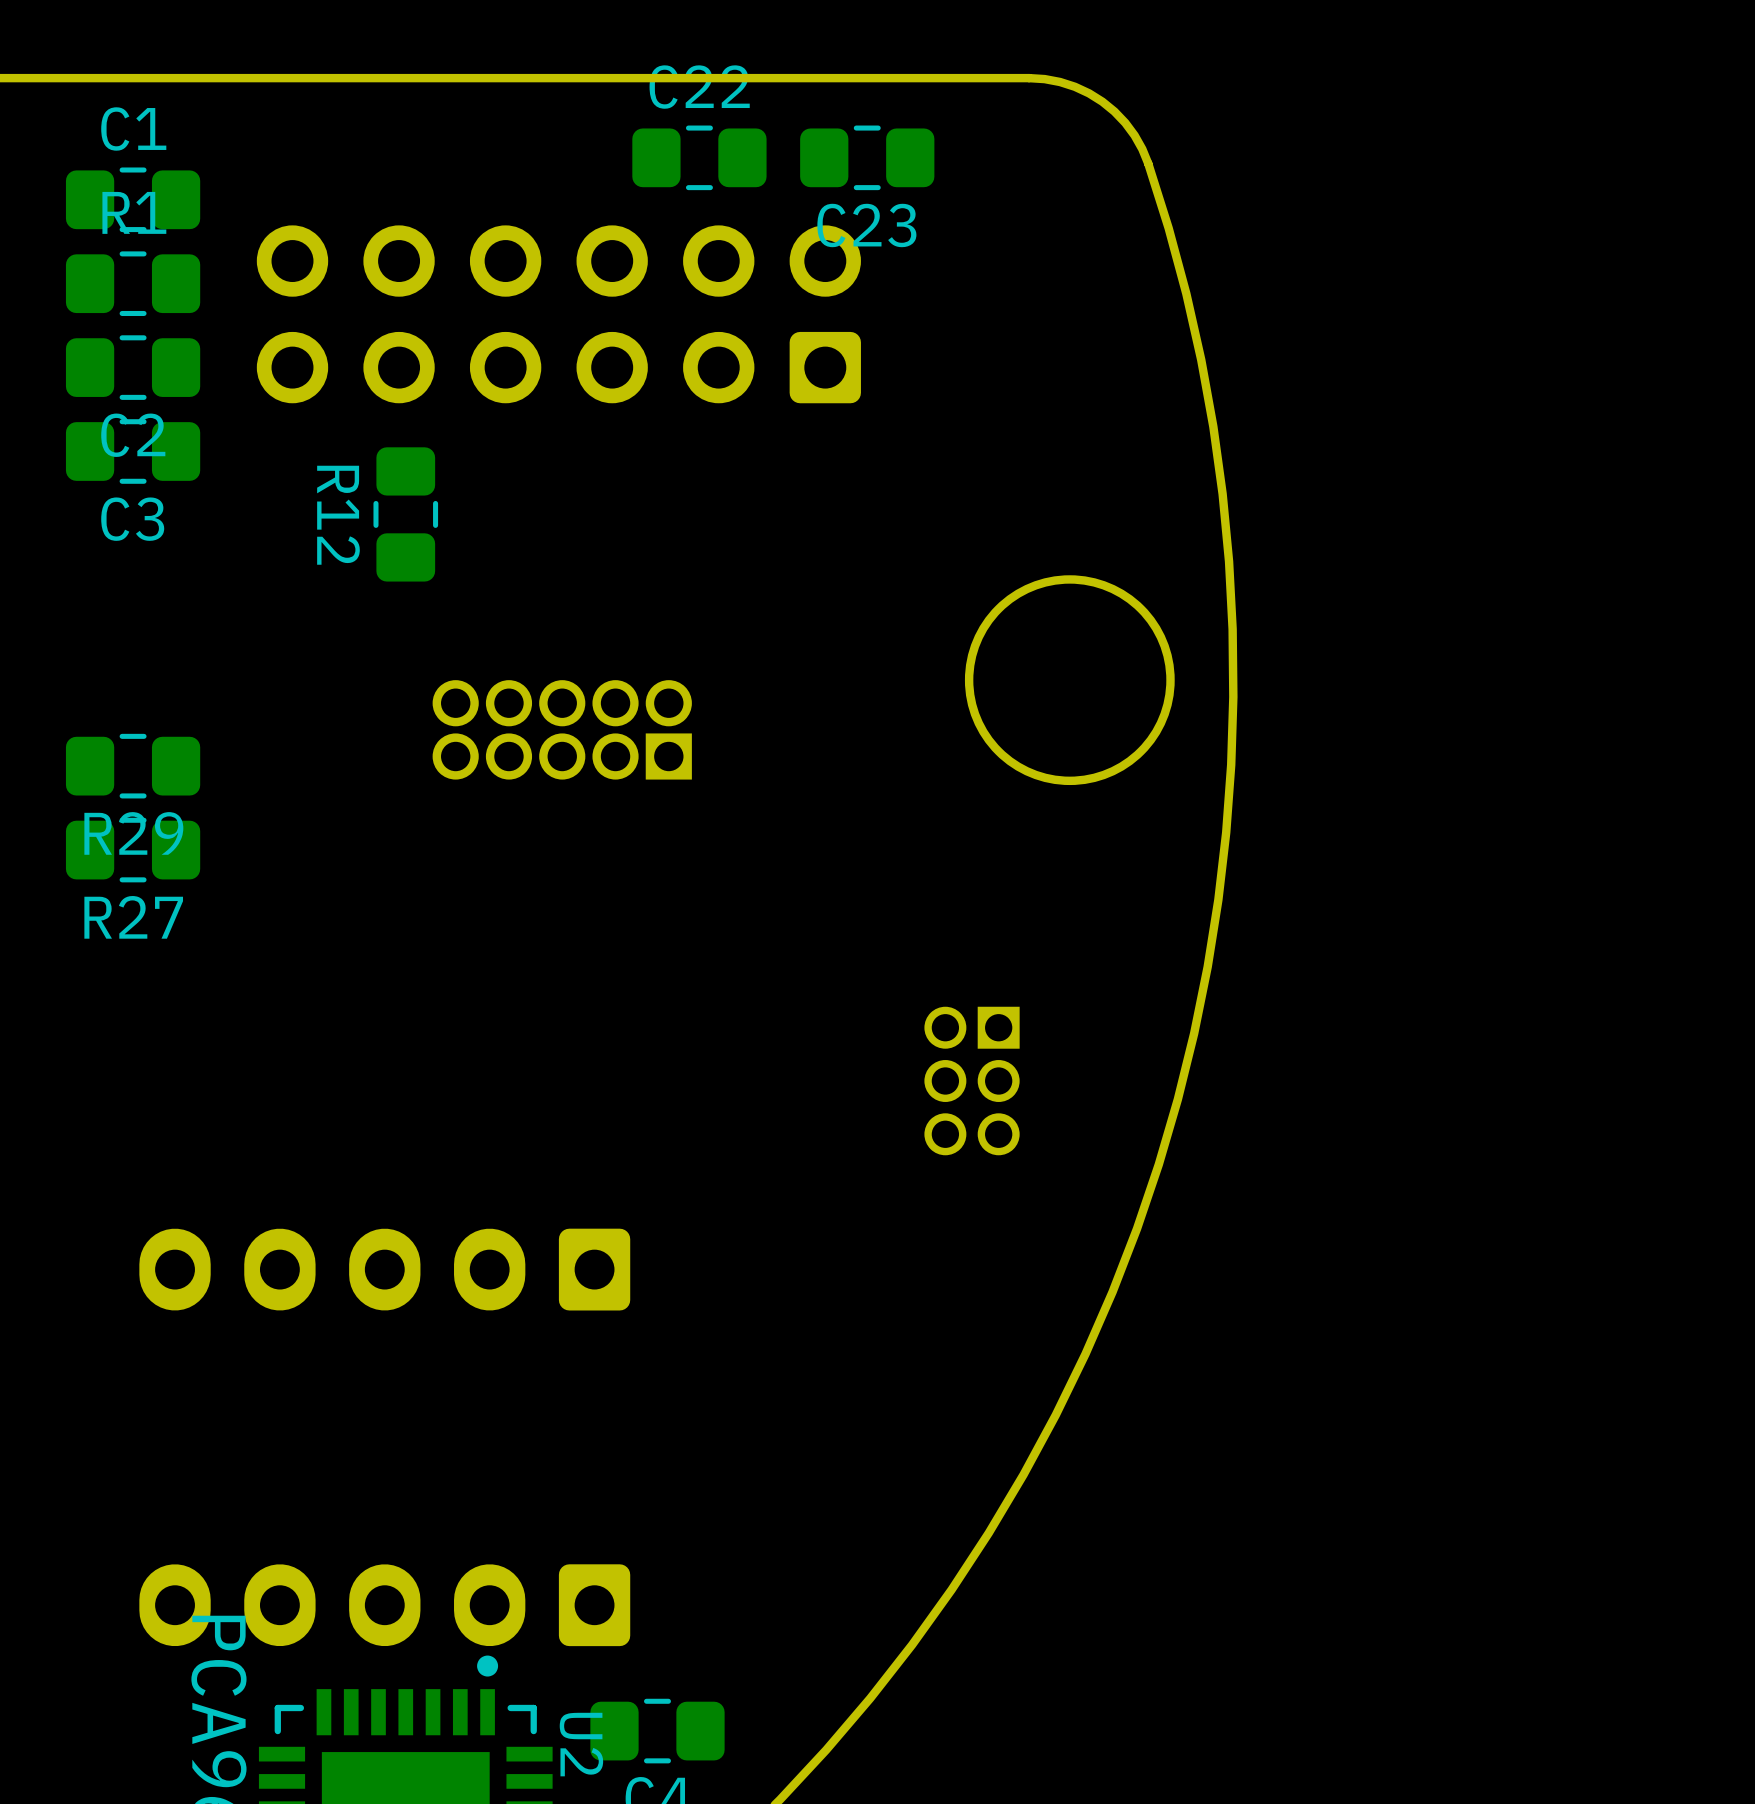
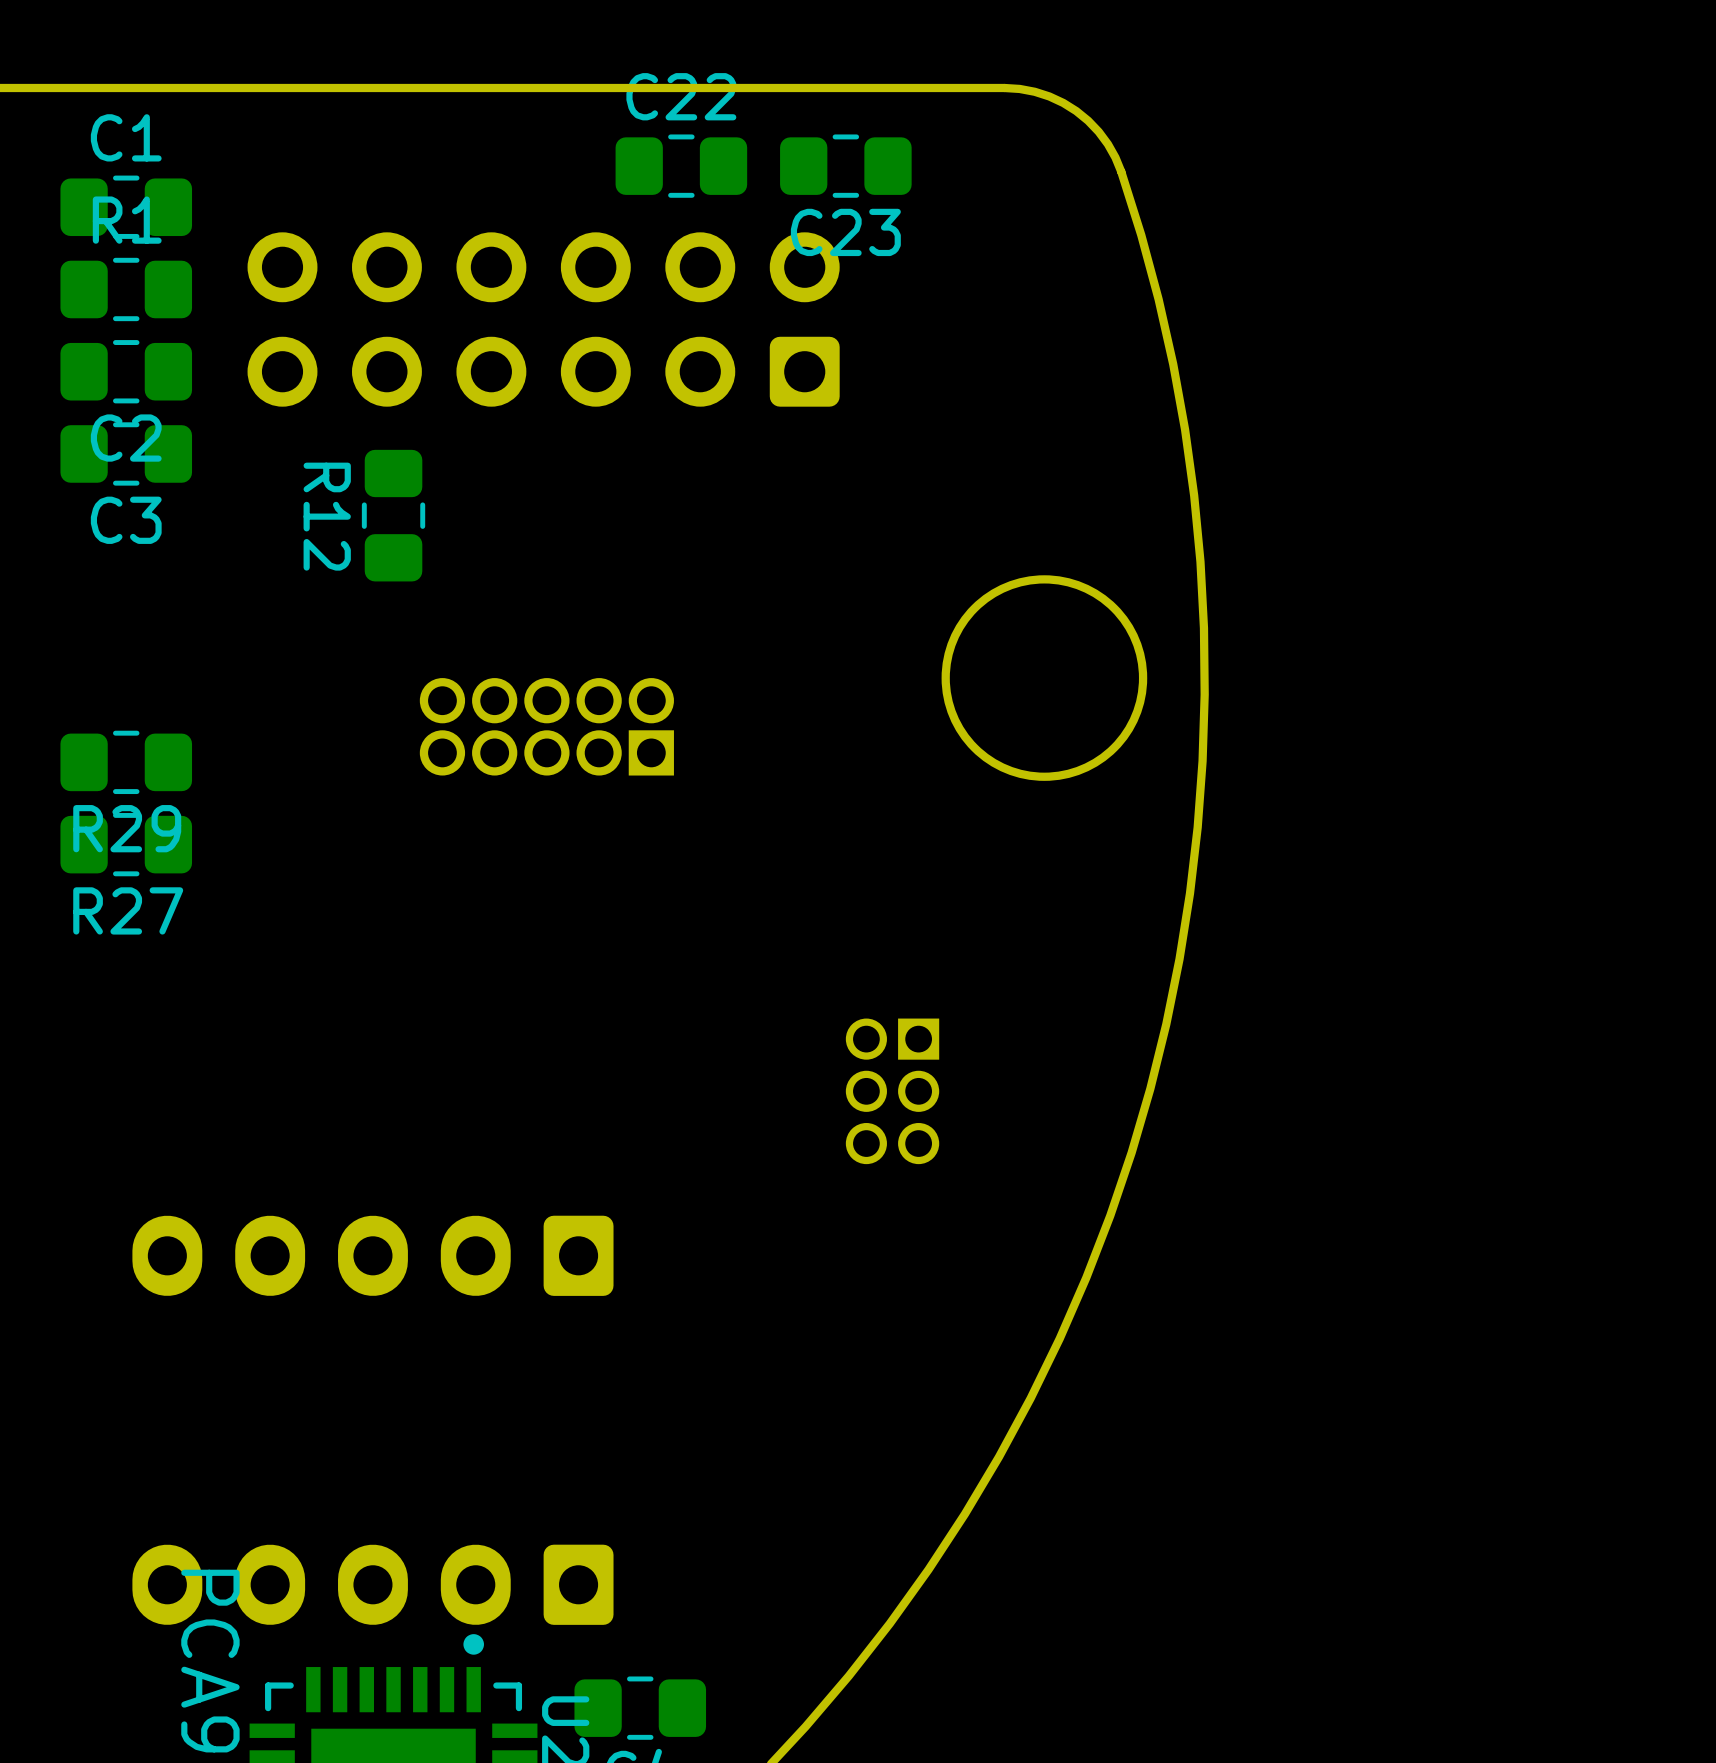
part position: (972, 1081) -> (892, 1091)

